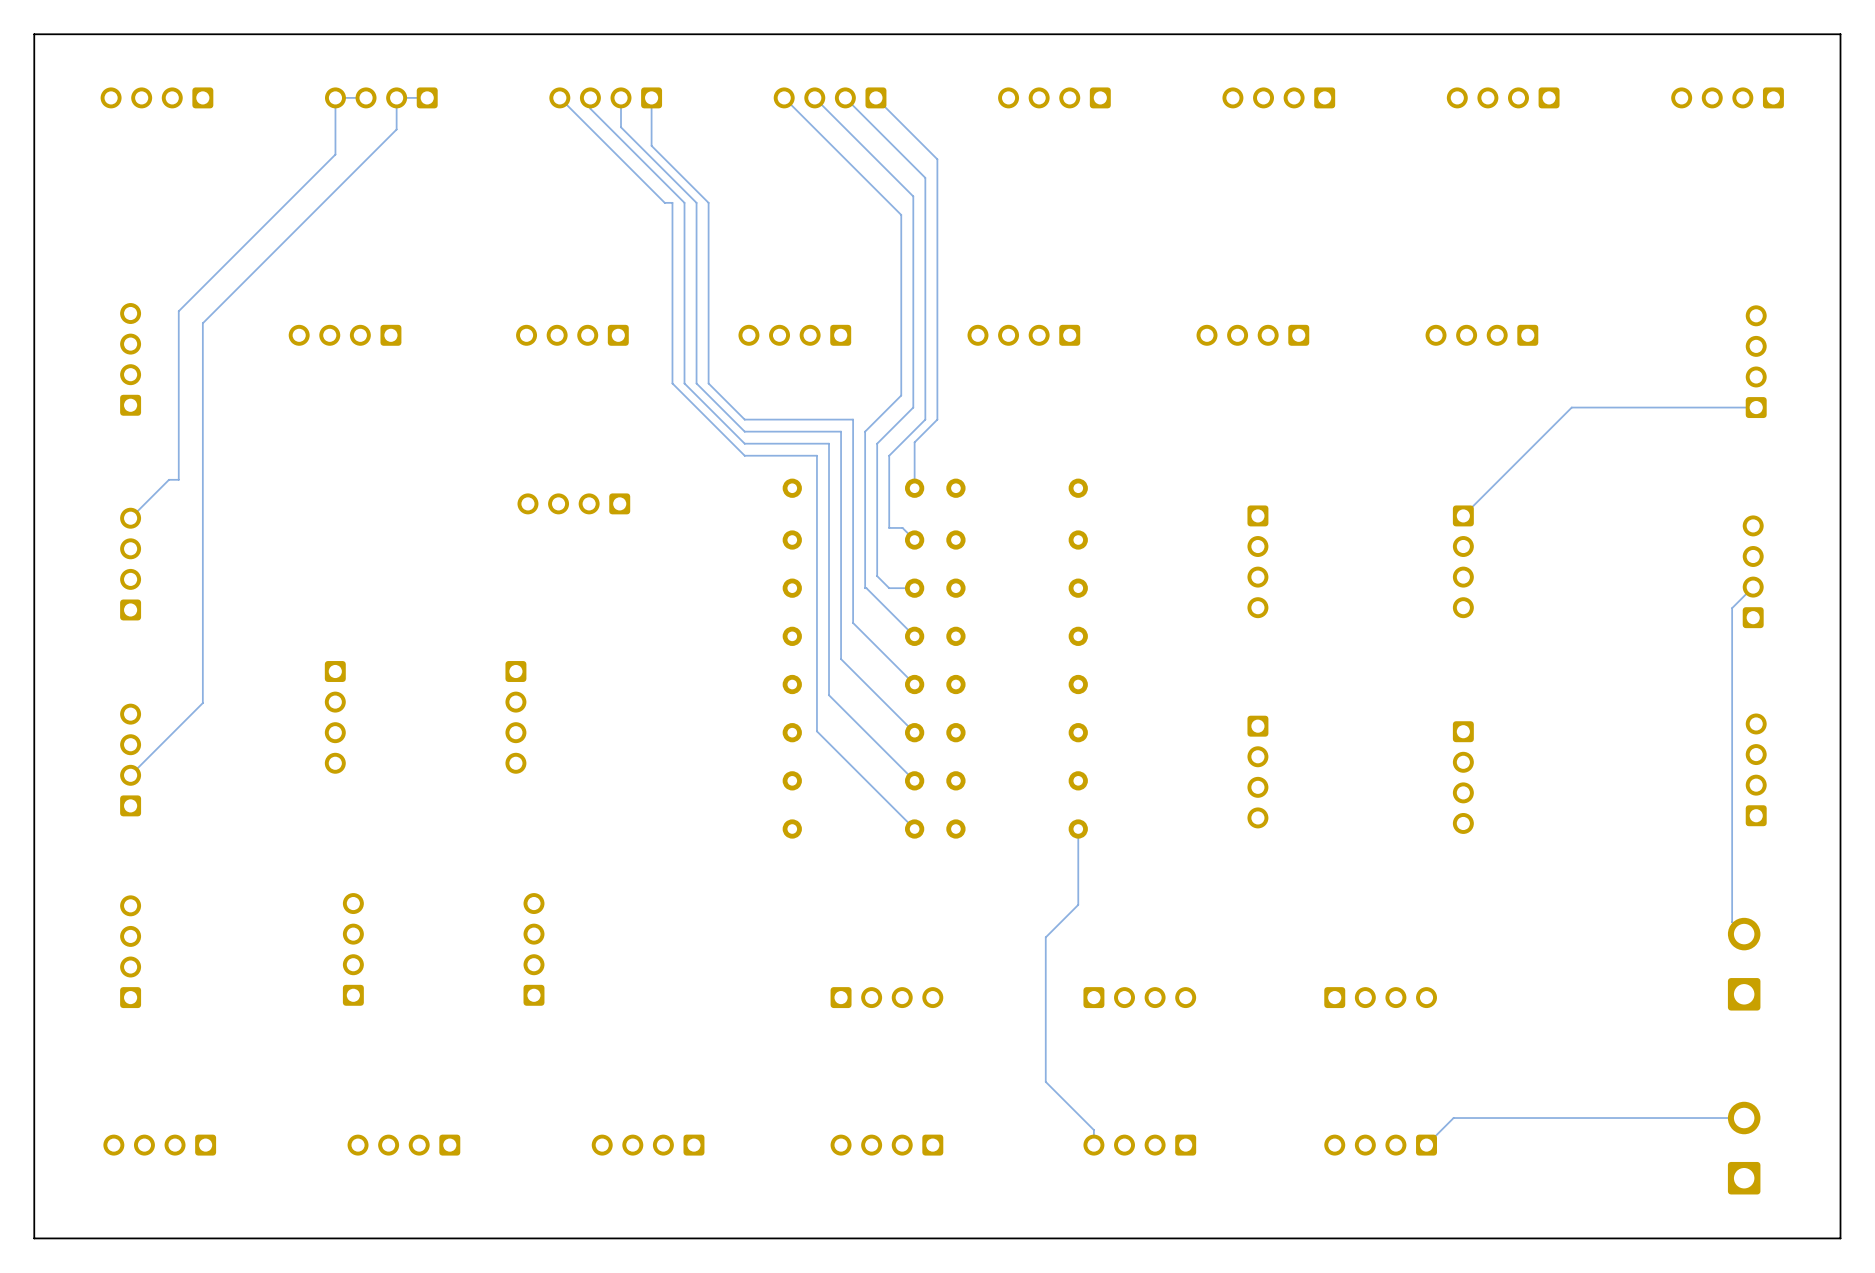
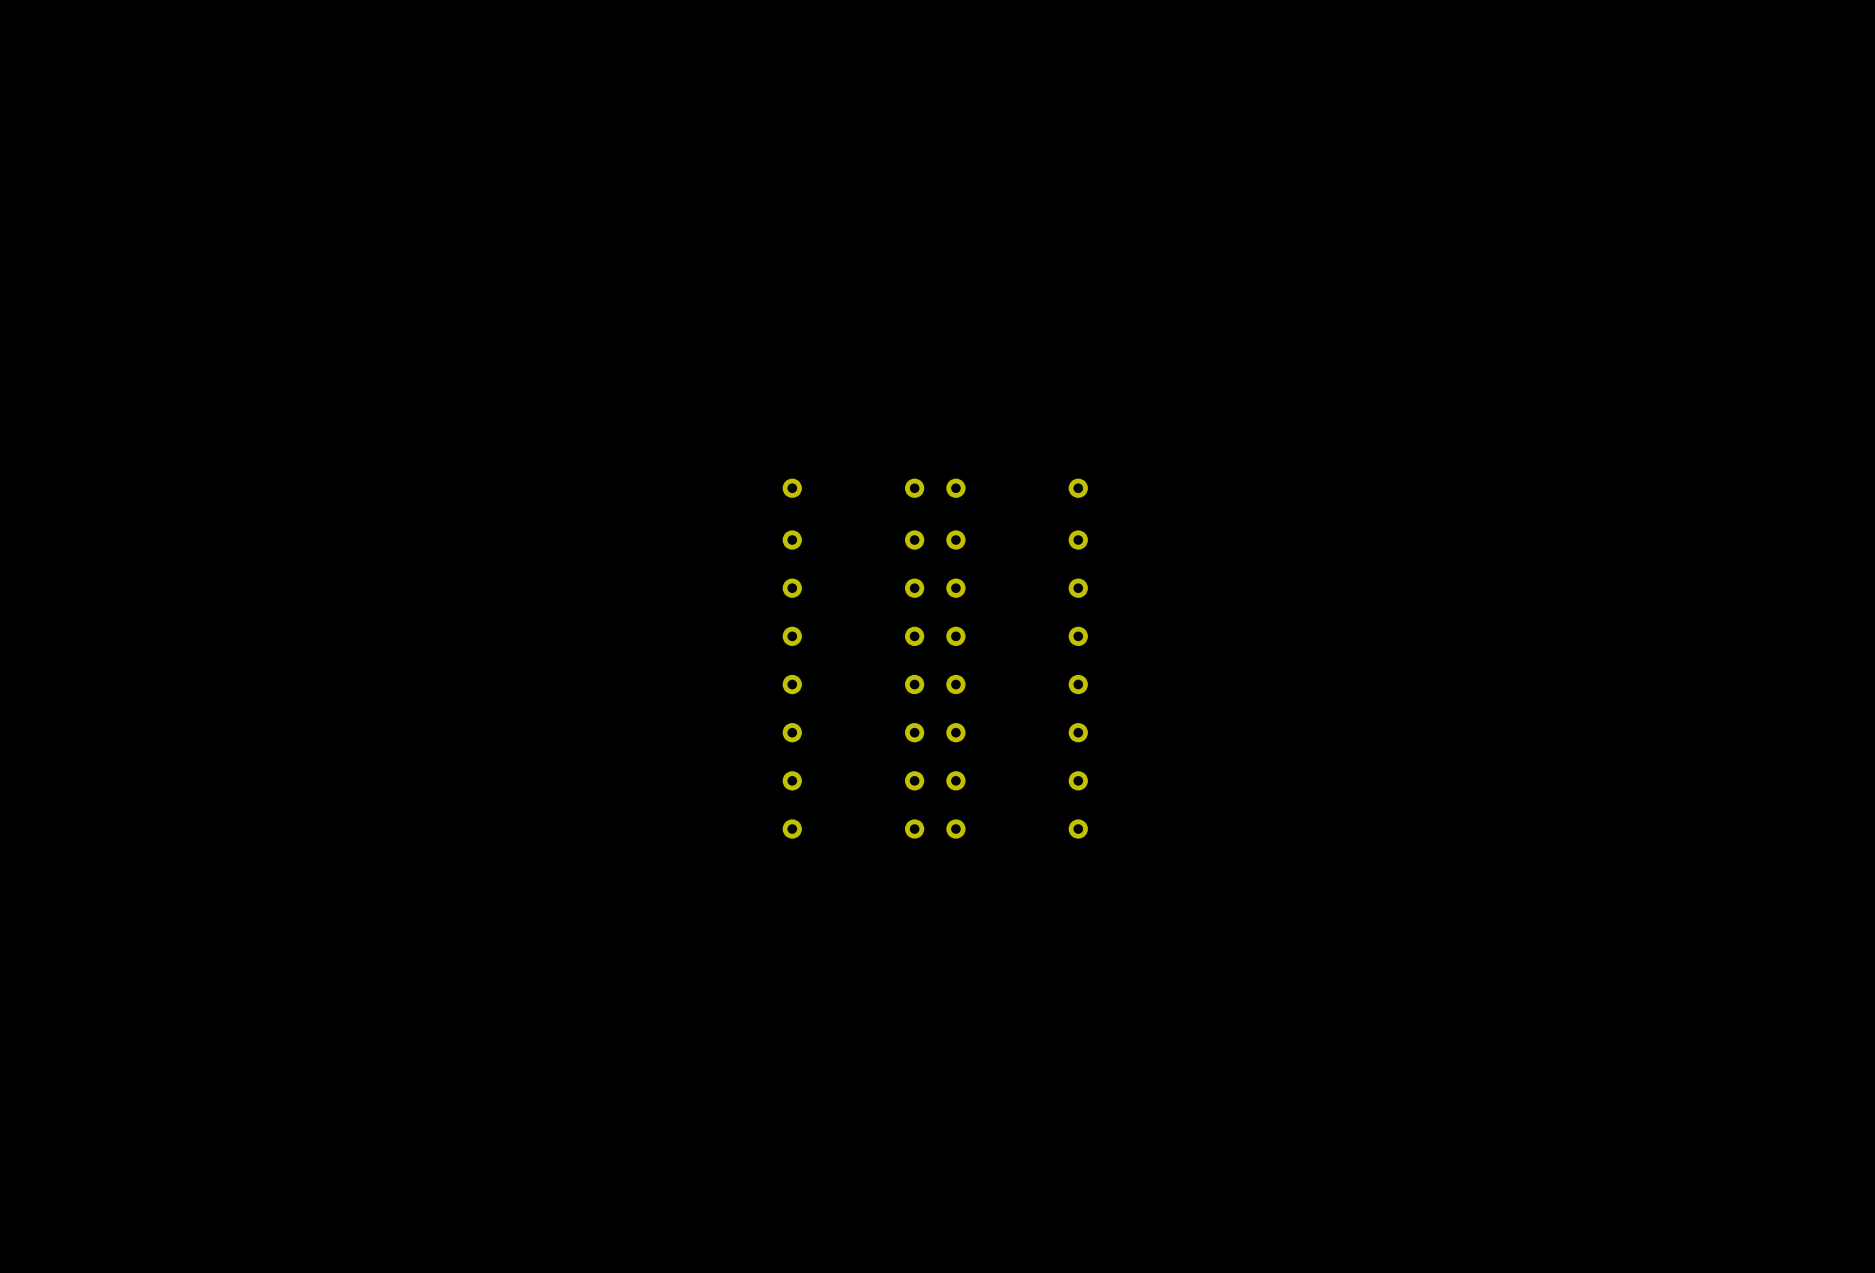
board edge: (1840, 34) (34, 34) (34, 1238) (1840, 1238) (1840, 34) -> none
part: (156, 97) -> none
track: (366, 97) (335, 97) (335, 154) (178, 311) (178, 479) (169, 479) (130, 518) -> none
part: (381, 97) -> none
track: (427, 97) (396, 97) (396, 129) (202, 323) (202, 703) (130, 775) -> none
track: (559, 97) (664, 202) (672, 202) (672, 383) (744, 455) (816, 455) (816, 731) (914, 829) -> none
track: (590, 97) (590, 108) (684, 202) (684, 383) (744, 443) (829, 443) (829, 695) (914, 780) -> none
part: (605, 97) -> none
track: (621, 97) (621, 127) (696, 202) (696, 383) (744, 431) (841, 431) (841, 659) (914, 732) -> none
track: (651, 97) (651, 145) (708, 202) (708, 383) (744, 419) (853, 419) (853, 622) (914, 684) -> none
track: (784, 97) (901, 214) -> none
track: (814, 97) (913, 196) (913, 407) (877, 443) (877, 576) (889, 588) (914, 588) -> none
part: (830, 97) -> none
track: (845, 97) (925, 177) (925, 419) (889, 455) (889, 527) (902, 527) (914, 540) -> none
track: (875, 97) (937, 159) (937, 419) (914, 442) (914, 488) -> none
part: (1054, 97) -> none
part: (1278, 97) -> none
part: (1503, 97) -> none
part: (1727, 97) -> none
track: (901, 214) (901, 395) (865, 431) (865, 588) (914, 636) -> none
part: (345, 335) -> none
part: (572, 335) -> none
part: (794, 335) -> none
part: (1023, 335) -> none
part: (1252, 335) -> none
part: (1481, 335) -> none
part: (130, 359) -> none
part: (1756, 361) -> none
track: (1756, 407) (1571, 407) (1463, 515) -> none
part: (573, 503) -> none
part: (1257, 561) -> none
part: (1463, 561) -> none
part: (130, 564) -> none
part: (1753, 571) -> none
track: (1753, 587) (1732, 608) (1732, 922) (1744, 934) -> none
part: (335, 717) -> none
part: (515, 717) -> none
part: (130, 760) -> none
part: (1756, 769) -> none
part: (1257, 772) -> none
part: (1463, 777) -> none
track: (1078, 829) (1078, 904) (1045, 937) (1045, 1081) (1093, 1130) (1093, 1145) -> none
part: (353, 949) -> none
part: (533, 949) -> none
part: (130, 951) -> none
part: (1744, 964) -> none
part: (886, 997) -> none
part: (1139, 997) -> none
part: (1380, 997) -> none
track: (1744, 1118) (1453, 1118) (1426, 1145) -> none
part: (159, 1145) -> none
part: (403, 1145) -> none
part: (648, 1145) -> none
part: (886, 1145) -> none
part: (1139, 1145) -> none
part: (1380, 1145) -> none
part: (1744, 1148) -> none

